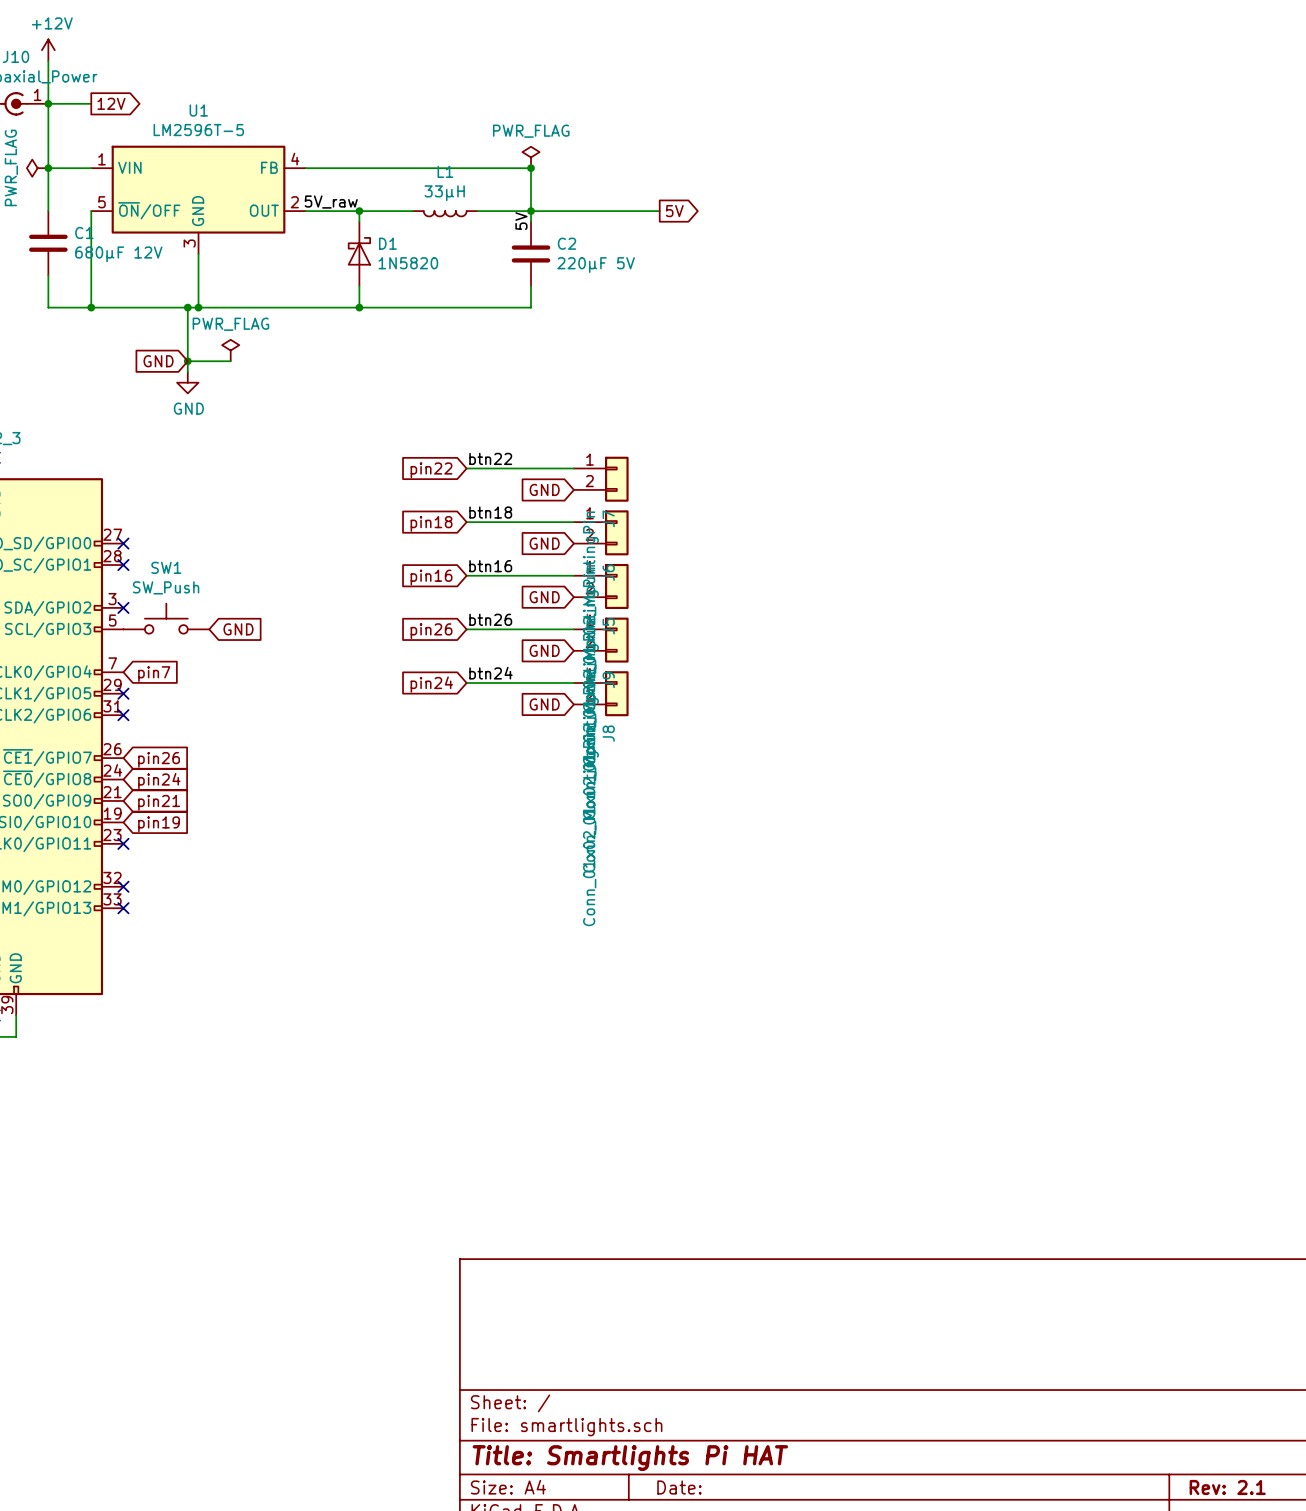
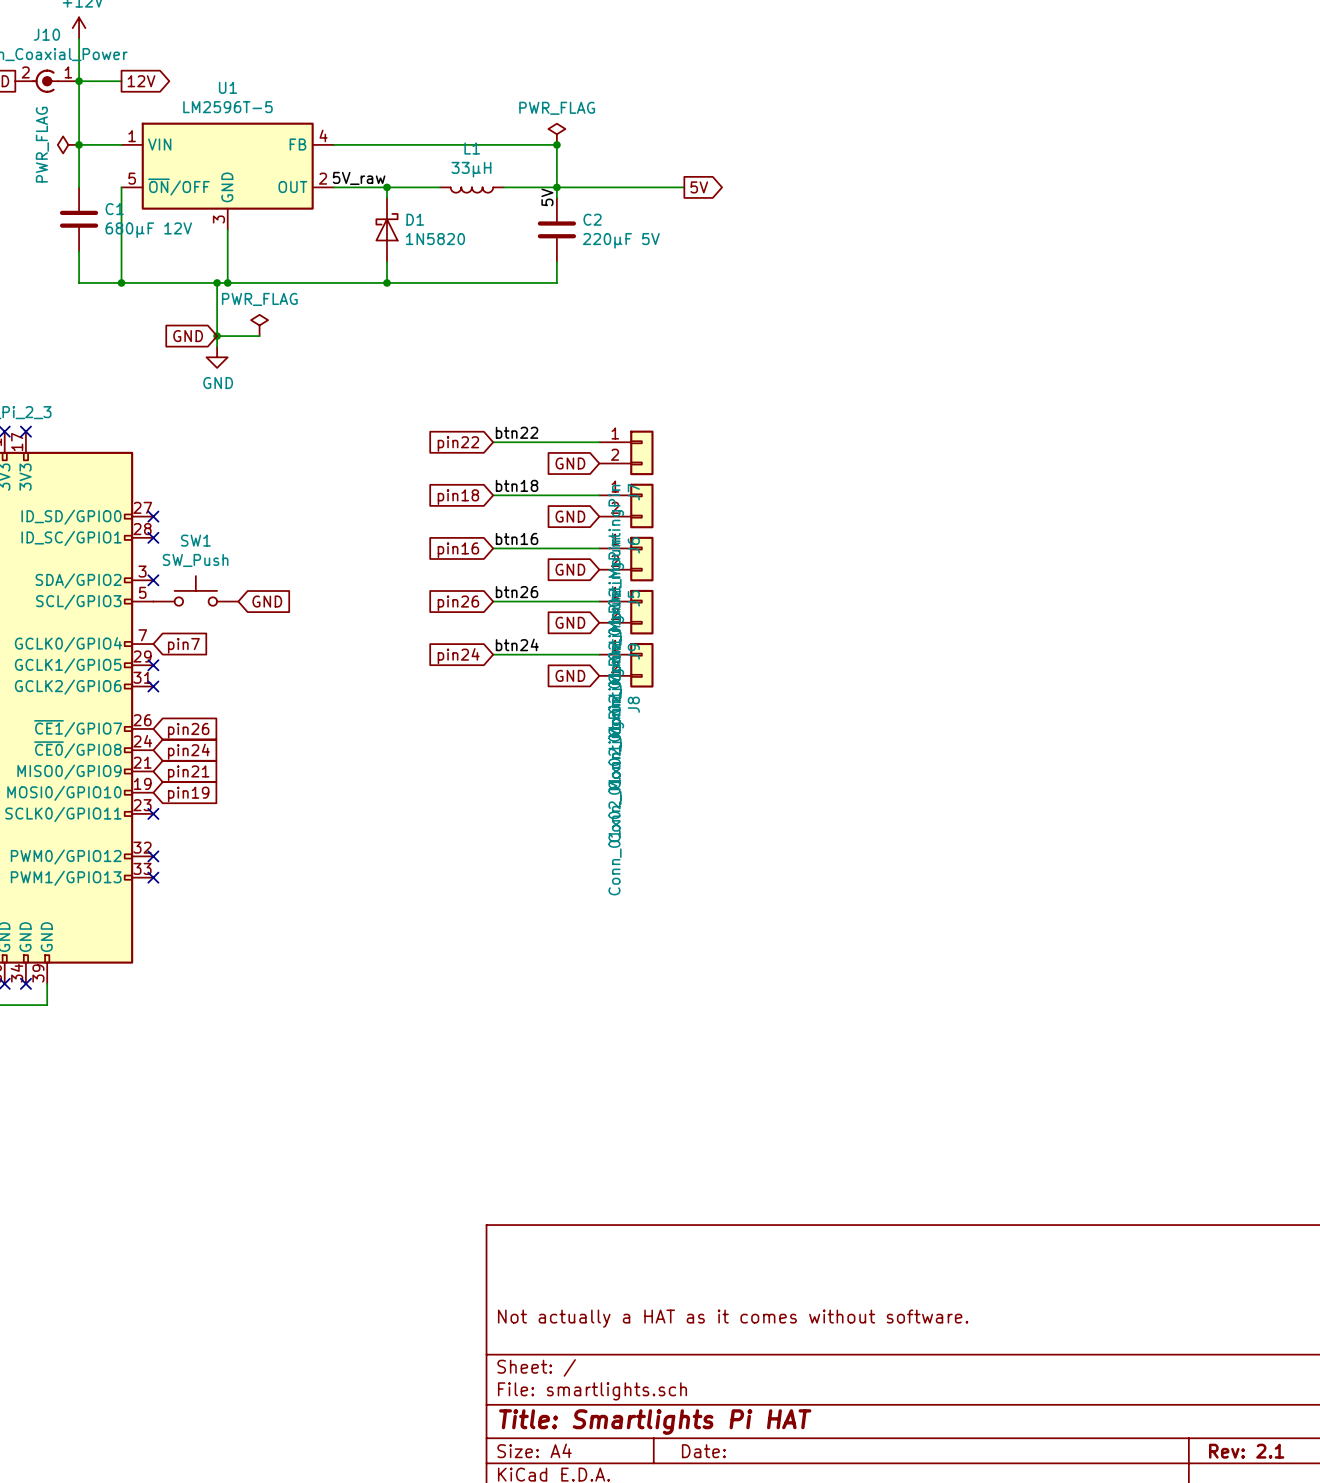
title block: none -> Not actually a HAT as it comes without software. (733, 1318)

